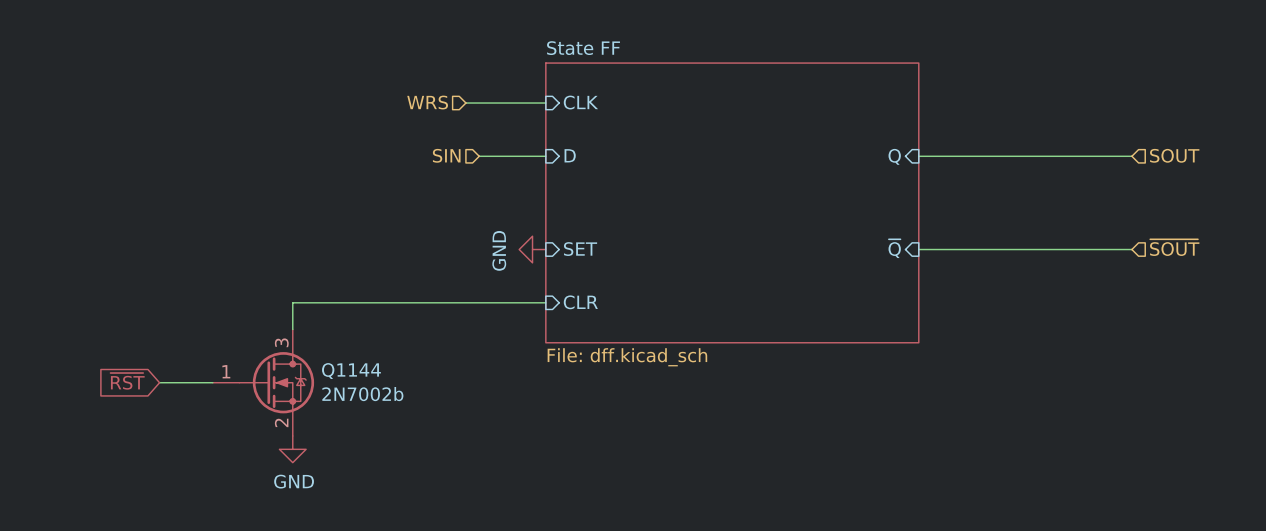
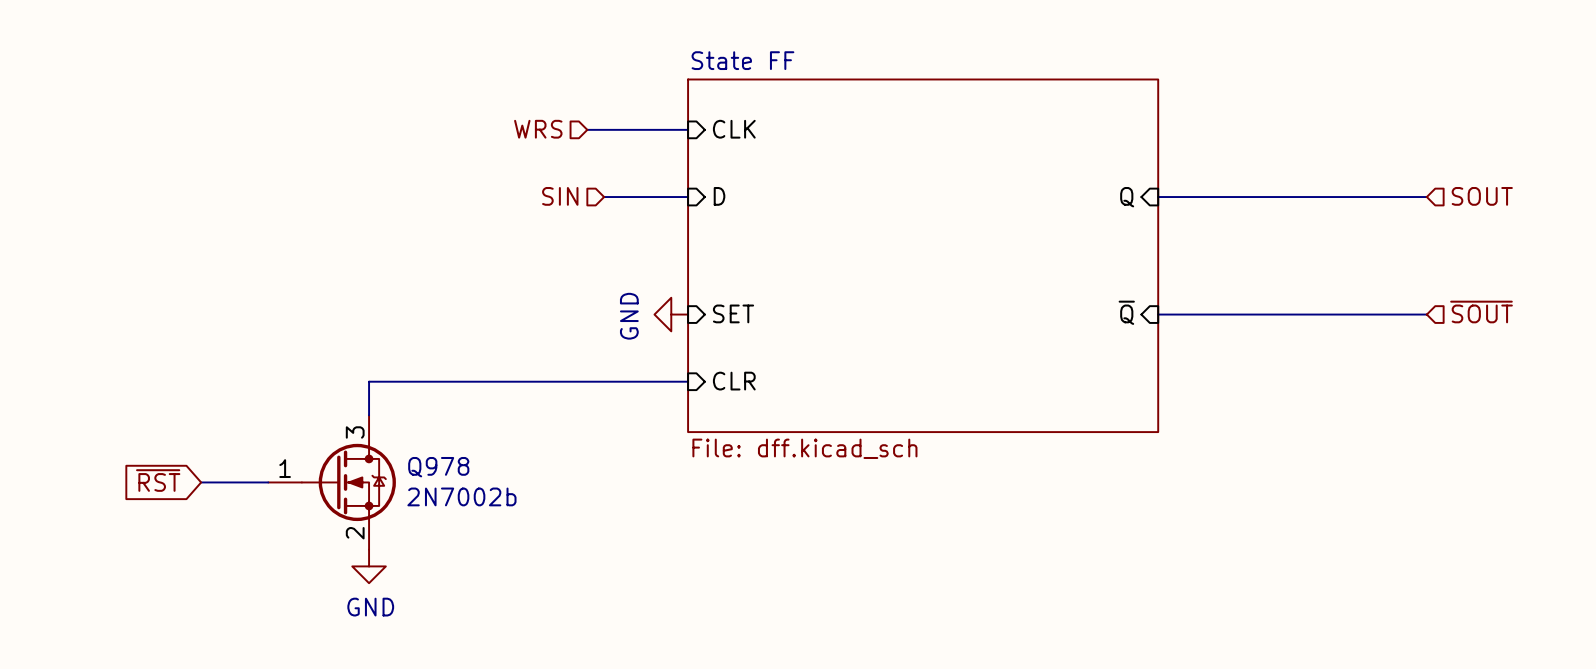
Q1144 name: Q1144 (351, 371) -> Q978 (438, 467)

